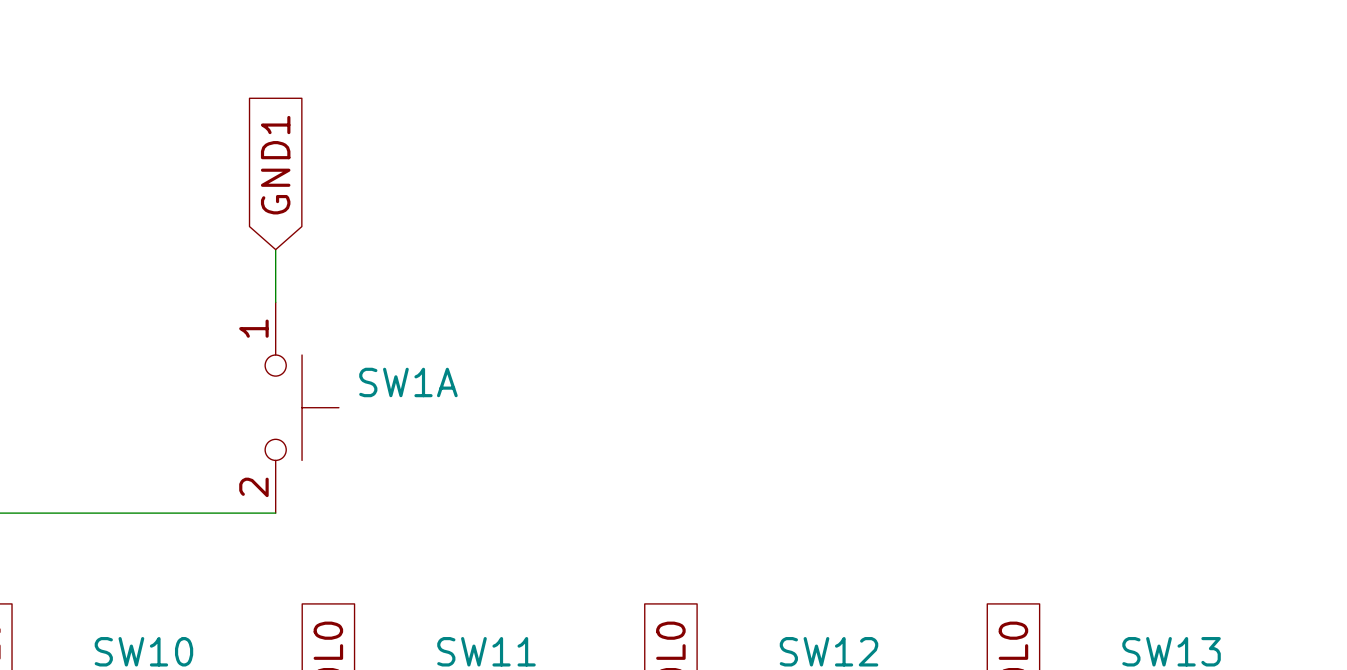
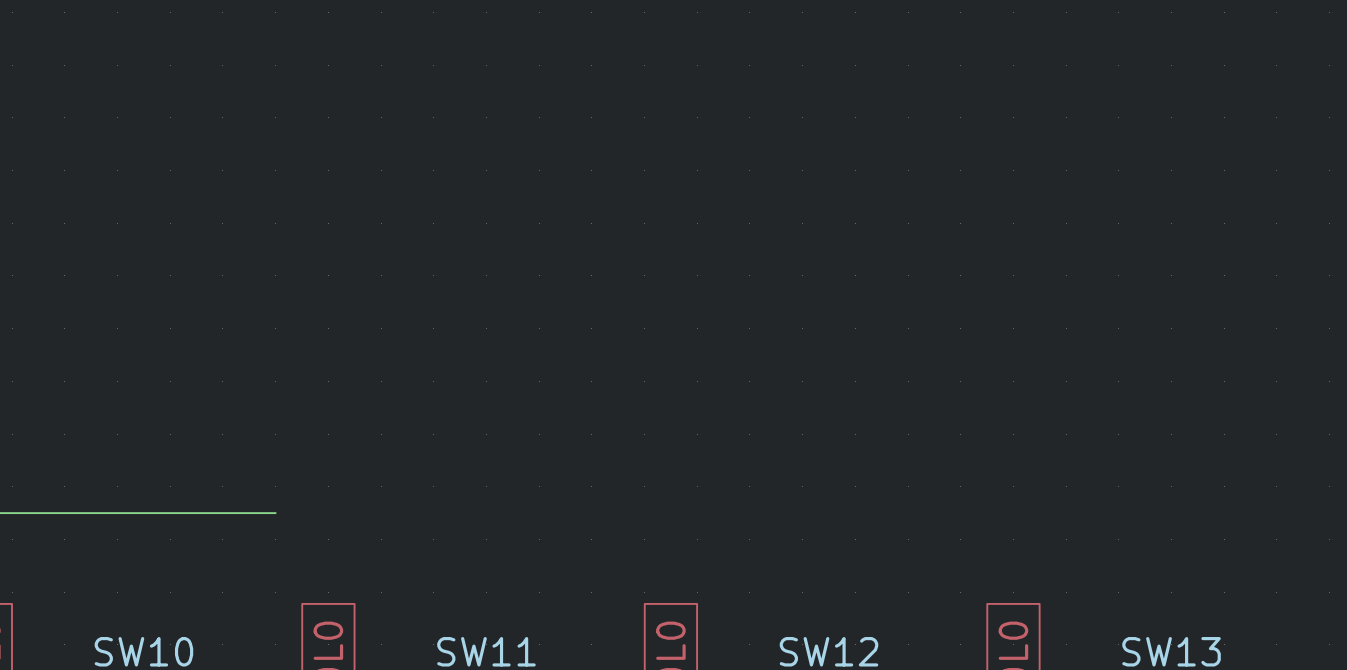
global label: GND1 (275, 165) -> none
wire: (275, 249) (275, 302) -> none
SW1A: (302, 407) -> none

